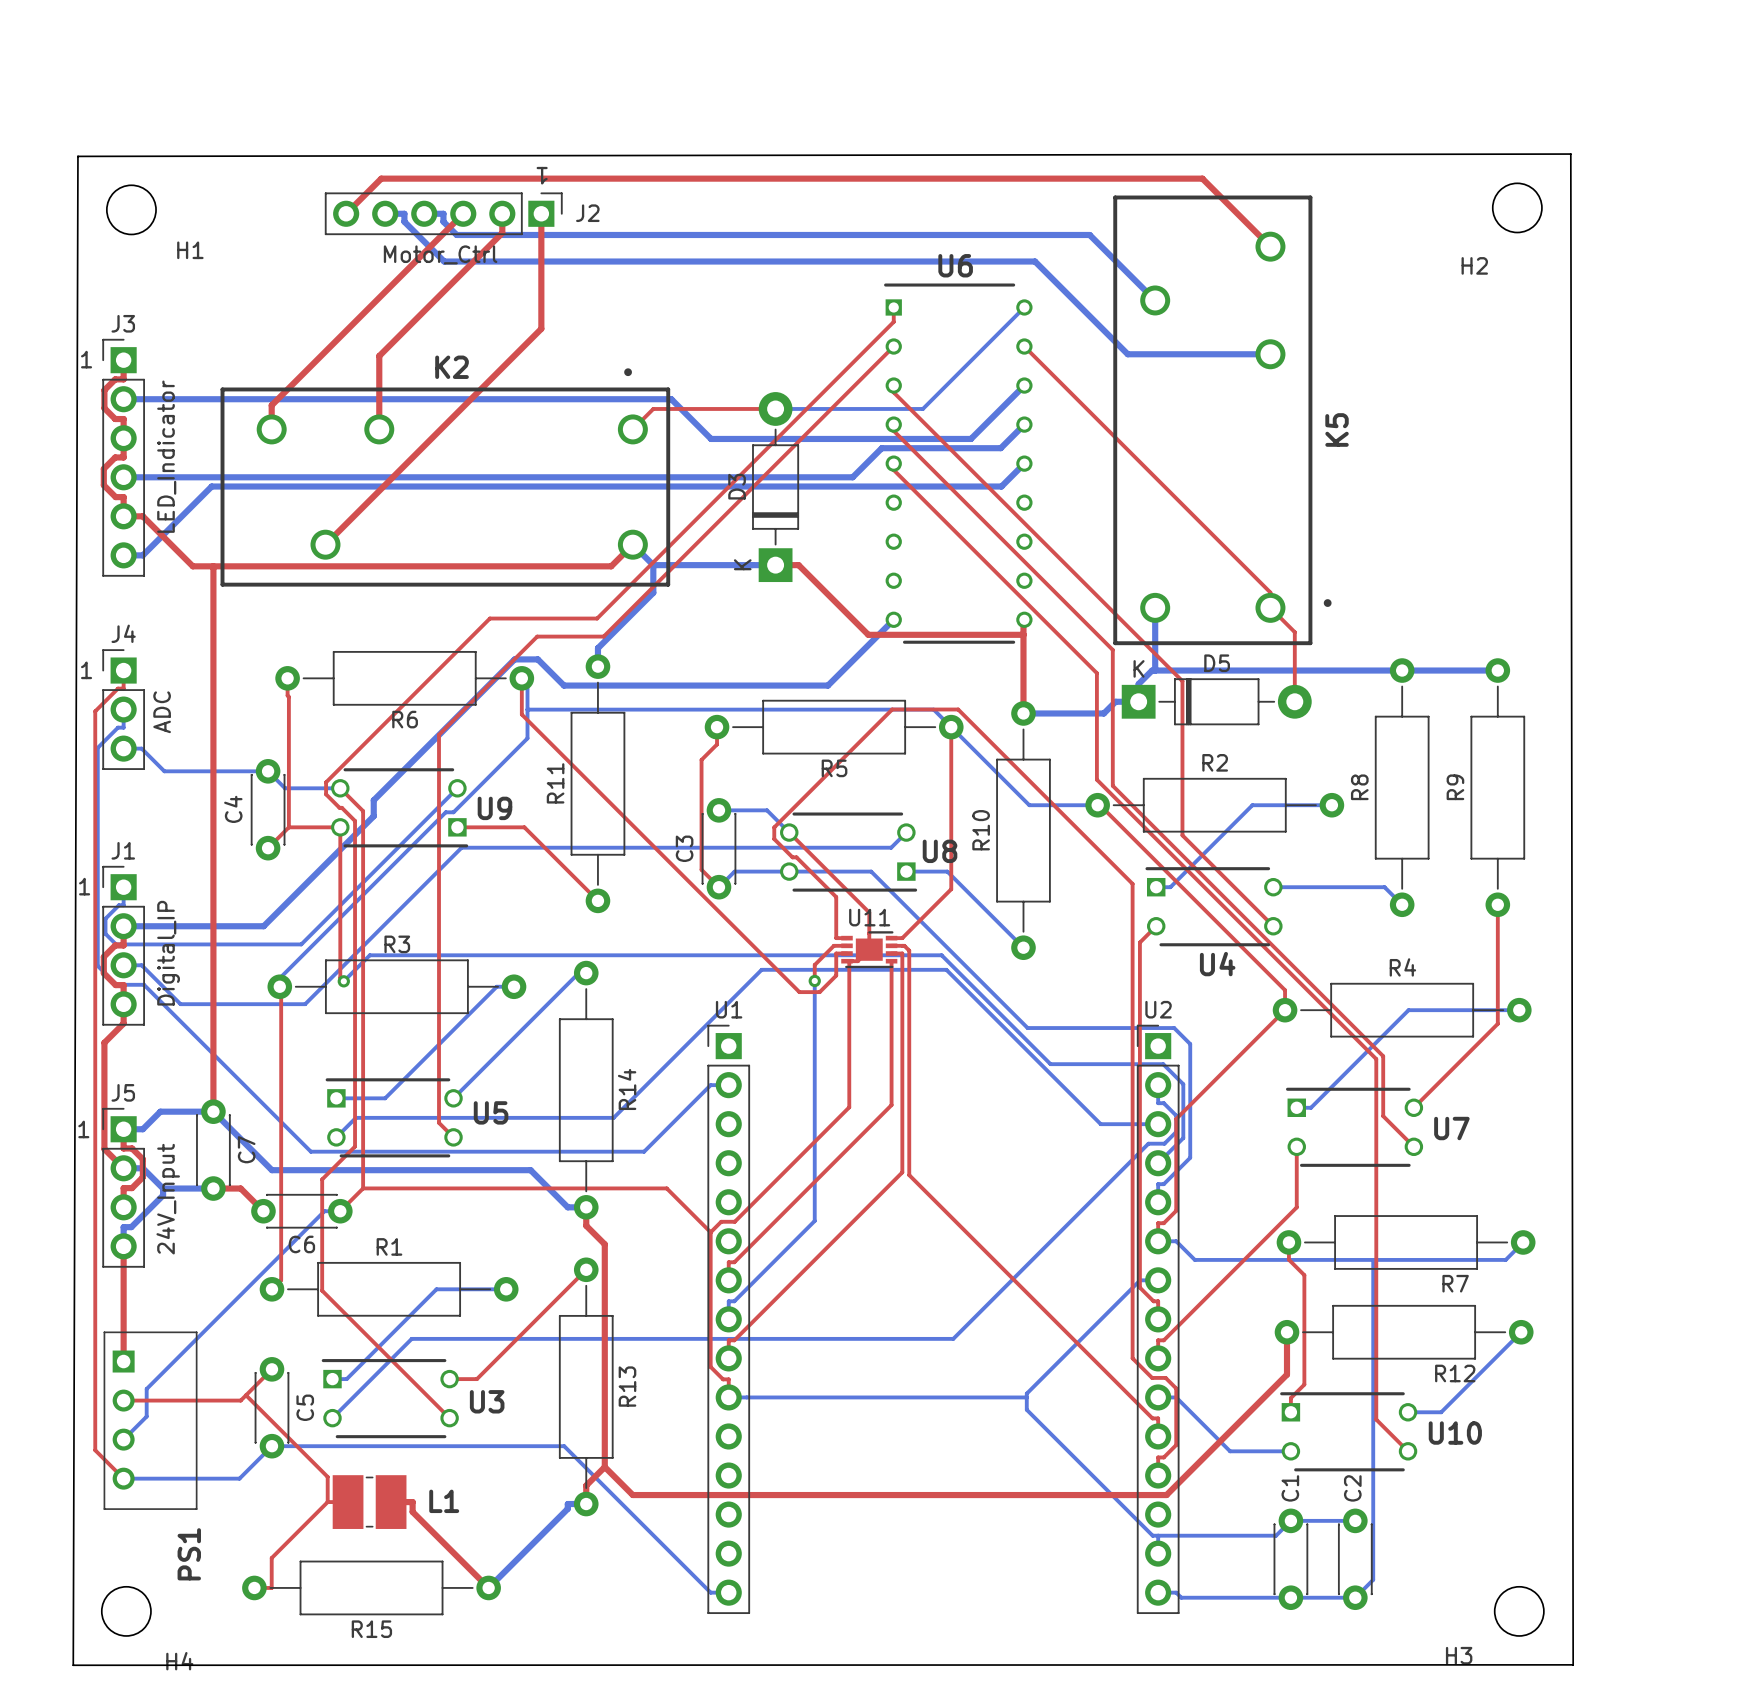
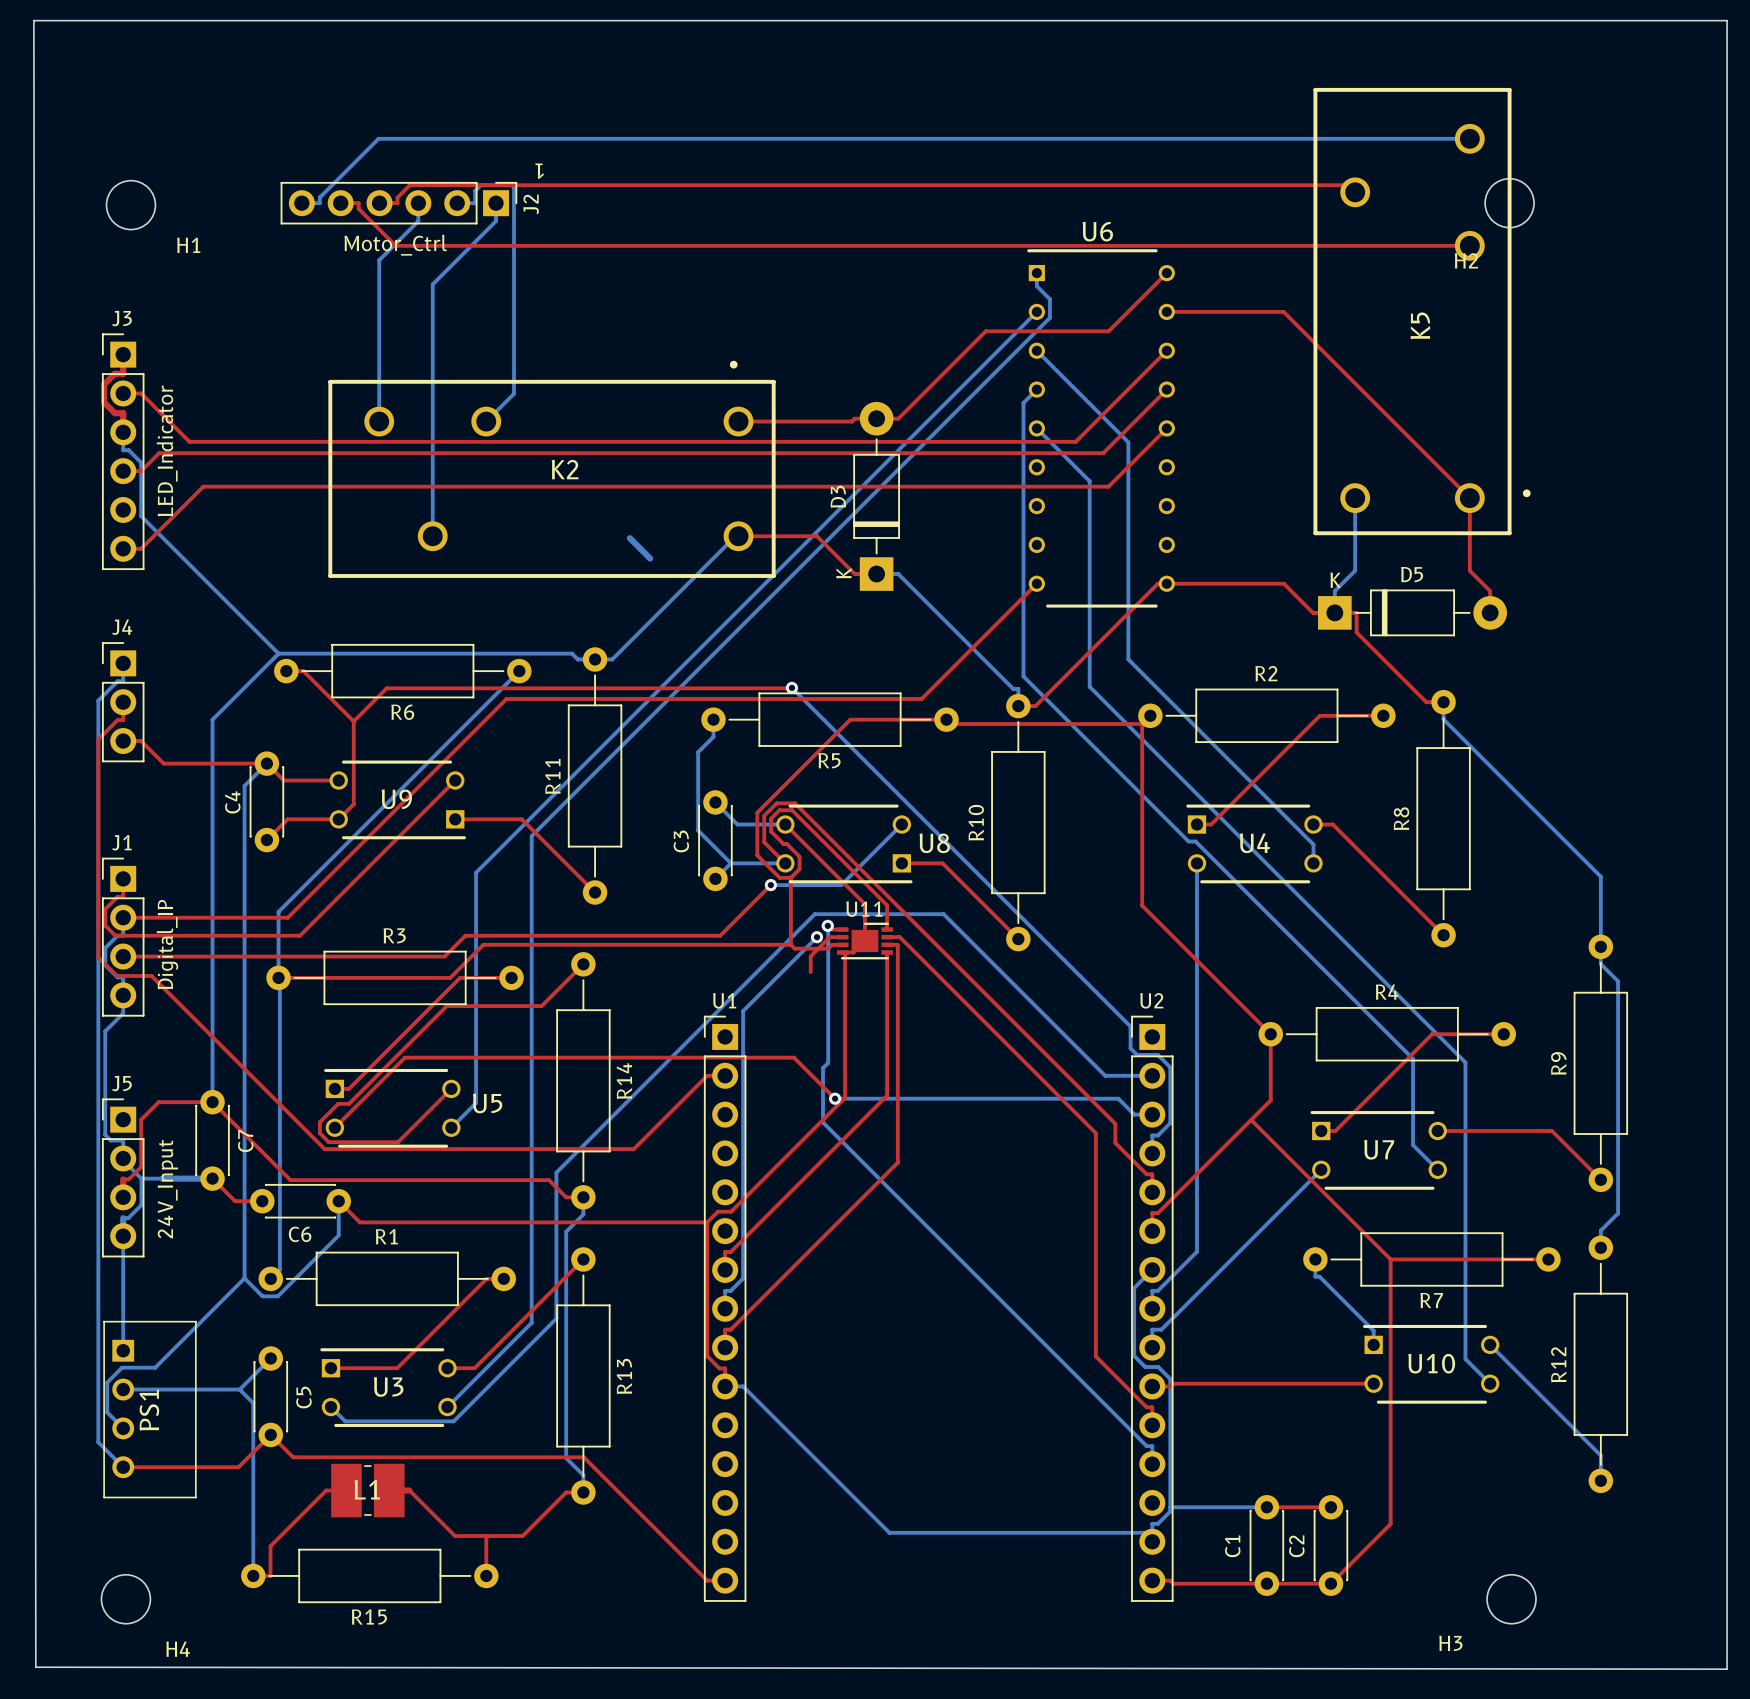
bottom track: none -> (1469, 138) (378, 138) (319, 197) (319, 203) (301, 203)
board edge: (1570, 154) (1573, 1664) (73, 1665) (77, 156) (1570, 154) -> (33, 20) (35, 1667) (1727, 1669) (1727, 20) (33, 20)
top track: none -> (1355, 192) (1348, 185) (409, 185) (397, 197) (397, 203) (379, 203)
top track: none -> (340, 203) (358, 203) (358, 208) (395, 245) (1469, 245)
bottom track: none -> (418, 203) (418, 221) (379, 260) (379, 421)
bottom track: none -> (457, 203) (475, 203) (475, 190) (480, 185) (511, 185) (513, 187) (513, 393) (486, 421)
bottom track: none -> (496, 203) (496, 221) (432, 284) (432, 536)
top track: (346, 213) (381, 178) (1202, 178) (1270, 246) -> none
bottom track: (385, 213) (404, 213) (404, 221) (444, 261) (1035, 261) (1127, 354) (1270, 354) -> none
bottom track: (424, 213) (443, 213) (443, 221) (456, 234) (1089, 234) (1155, 300) -> none
J2 position: (443, 213) -> (398, 203)
top track: (463, 213) (271, 405) (271, 429) -> none
top track: (502, 213) (502, 232) (379, 356) (379, 429) -> none
top track: (541, 213) (541, 328) (325, 544) -> none
J2 name rotation: 0° (587, 213) -> 90° counterclockwise (531, 204)
bottom track: none -> (1036, 273) (1036, 286) (1049, 299) (1049, 317) (531, 836) (531, 1322) (447, 1407)
top track: none -> (1166, 273) (1108, 331) (985, 331) (898, 418) (854, 418) (851, 421) (738, 421)
top track: (893, 307) (893, 321) (597, 618) (489, 618) (326, 782) (326, 794) (355, 820) (355, 1146) (322, 1179) (322, 1290) (449, 1418) -> none
bottom track: (1024, 307) (922, 408) (775, 408) -> none
bottom track: none -> (1036, 311) (476, 872) (476, 1103) (451, 1127)
top track: none -> (1166, 311) (1283, 311) (1469, 498) (1469, 570) (1490, 591) (1490, 612)
top track: (893, 346) (603, 636) (537, 636) (439, 734) (439, 1122) (453, 1137) -> none
top track: (1024, 346) (1270, 592) (1270, 607) (1294, 632) (1294, 701) -> none
bottom track: none -> (1036, 350) (1128, 442) (1128, 659) (1313, 844) (1313, 863)
top track: none -> (1166, 350) (1075, 441) (189, 441) (141, 393) (123, 393)
text: 1 (86, 359) -> none
K2 name position: K2 (452, 367) -> K2 (565, 469)
top track: (893, 385) (893, 392) (1182, 681) (1182, 835) (1273, 926) -> none
bottom track: (1024, 385) (970, 438) (711, 438) (671, 399) (123, 399) -> none
bottom track: none -> (1036, 389) (1023, 402) (1023, 676) (1188, 841) (1195, 841) (1413, 1058) (1413, 1145) (1437, 1169)
top track: none -> (1166, 389) (1103, 453) (159, 453) (141, 471) (123, 471)
top track: (775, 408) (653, 408) (632, 429) -> none
K5 position: (1222, 420) -> (1422, 311)
top track: (893, 424) (893, 430) (1112, 649) (1112, 785) (1383, 1056) (1383, 1116) (1413, 1146) -> none
bottom track: (1024, 424) (1000, 448) (881, 448) (852, 477) (123, 477) -> none
K5 name position: K5 (1337, 429) -> K5 (1420, 325)
bottom track: none -> (1036, 428) (1089, 481) (1089, 686) (1465, 1062) (1465, 1359) (1490, 1383)
top track: none -> (1166, 428) (1108, 486) (203, 486) (141, 548) (123, 548)
top track: (123, 438) (123, 457) (115, 457) (103, 468) (103, 485) (115, 497) (123, 497) (123, 516) (142, 516) (192, 566) (611, 566) (632, 544) -> none
bottom track: none -> (123, 432) (123, 450) (128, 450) (141, 462) (141, 516) (278, 653)
top track: (893, 463) (893, 470) (1096, 673) (1096, 779) (1376, 1059) (1376, 1419) (1408, 1451) -> none
U6 position: (958, 463) -> (1101, 428)
bottom track: (1024, 463) (1001, 486) (211, 486) (142, 555) (123, 555) -> none
K2 position: (445, 477) -> (552, 469)
D3 position: (775, 487) -> (876, 496)
bottom track: none -> (1355, 498) (1355, 570) (1334, 591) (1334, 612)
top track: none -> (738, 536) (817, 536) (854, 574) (876, 574)
bottom track: none -> (738, 536) (735, 536) (612, 659) (577, 659) (572, 653) (278, 653)
top track: (775, 565) (798, 565) (868, 634) (1023, 634) -> none
bottom track: (775, 565) (653, 565) (653, 592) (597, 648) (597, 666) -> none
top track: (213, 566) (213, 1111) -> none
bottom track: (1155, 607) (1155, 670) -> none
bottom track: (893, 619) (827, 685) (564, 685) (537, 659) (514, 659) (373, 800) (373, 816) (263, 926) (123, 926) -> none
top track: (1024, 619) (1023, 713) -> (1443, 702) (1426, 702) (1356, 632) (1356, 612) (1313, 612) (1283, 583) (1157, 583) (1035, 706) (1018, 706)
bottom track: none -> (278, 653) (212, 719) (212, 1102)
text: 1 (86, 670) -> none
top track: (123, 670) (123, 688) (117, 688) (95, 711) (95, 1450) (123, 1478) -> (725, 1580) (707, 1580) (583, 1457) (293, 1457) (270, 1434) (238, 1467) (123, 1467)
bottom track: (1497, 670) (1152, 670) (1138, 683) (1138, 701) (1115, 701) (1103, 713) (1023, 713) -> (876, 574) (898, 574) (1013, 688) (1018, 688) (1018, 706)
top track: (287, 678) (288, 827) -> (286, 671) (303, 671) (353, 721)
top track: (521, 678) (521, 714) (799, 992) (819, 992) (836, 975) (836, 953) -> (790, 944) (794, 948) (828, 948) (832, 944)
bottom track: (521, 678) (527, 684) (527, 738) (453, 812) (445, 812) (279, 978) -> (519, 671) (278, 911) (278, 969)
top track: none -> (791, 687) (386, 688) (353, 721)
via: none -> (791, 687)
D5 position: (1216, 701) -> (1412, 612)
top track: none -> (123, 702) (123, 720) (117, 720) (98, 739) (98, 957) (117, 975) (151, 975) (324, 1149) (633, 1149) (707, 1075) (725, 1075)
bottom track: (123, 709) (123, 727) (117, 727) (97, 747) (97, 965) (105, 973) -> (123, 917) (123, 935) (117, 935) (105, 948) (105, 965)
bottom track: (527, 709) (933, 709) (1029, 805) (1097, 805) -> none
bottom track: none -> (1443, 702) (1443, 719) (1600, 876) (1600, 964) (1618, 981) (1618, 1213) (1600, 1230) (1600, 1247)
J4 value: ADC (162, 712) -> none
top track: none -> (1383, 715) (1319, 715) (1211, 824) (1196, 824)
top track: (717, 727) (717, 744) (701, 759) (701, 869) (718, 887) -> none
bottom track: none -> (713, 719) (713, 736) (698, 752) (698, 830) (730, 863)
top track: (951, 727) (951, 889) (902, 938) (891, 938) -> (779, 810) (792, 810) (887, 905) (887, 929)
top track: none -> (1142, 724) (950, 724) (946, 719) (850, 719) (757, 812) (757, 855) (779, 877) (790, 877)
bottom track: (123, 748) (141, 748) (164, 771) (268, 771) (285, 788) (340, 788) -> none
bottom track: none -> (266, 763) (244, 785) (244, 1278)
R8 position: (1402, 787) -> (1443, 818)
R9 position: (1497, 787) -> (1600, 1063)
top track: (340, 788) (363, 811) (363, 1188) -> (338, 780) (283, 780) (266, 763) (163, 763) (141, 741) (123, 741)
top track: none -> (455, 780) (299, 935) (115, 935) (105, 925) (105, 909) (117, 896) (123, 896) (123, 878)
bottom track: (457, 788) (301, 944) (116, 944) (105, 933) (105, 918) (118, 905) (123, 905) (123, 887) -> none
top track: (1097, 805) (1100, 805) (1285, 990) (1285, 1010) (1176, 1118) (1176, 1210) -> (1142, 724) (1142, 905) (1270, 1034) (1270, 1100) (1170, 1200)
R2 position: (1214, 805) -> (1266, 715)
bottom track: (1331, 805) (1252, 805) (1170, 887) (1156, 887) -> none
U9 name position: U9 (494, 808) -> U9 (396, 799)
bottom track: (718, 810) (767, 810) (789, 832) -> (715, 802) (737, 824) (785, 824)
top track: (783, 818) (892, 709) (958, 709) (1132, 883) (1132, 1358) (1152, 1377) (1165, 1377) (1176, 1388) (1176, 1445) (1163, 1457) (1158, 1457) (1158, 1475) -> none
top track: (774, 826) (774, 839) (792, 857) (796, 857) (836, 897) (836, 938) -> (771, 818) (771, 831) (799, 856) (799, 869) (790, 877)
top track: (340, 827) (340, 977) (343, 981) -> (338, 819) (353, 804) (353, 721)
top track: none -> (1313, 824) (1332, 824) (1443, 935)
bottom track: (891, 847) (461, 847) (305, 1004) (180, 1004) (141, 965) (123, 965) -> (886, 839) (841, 885) (770, 885)
top track: none -> (785, 863) (764, 842) (764, 815) (776, 803) (794, 803) (1115, 1123) (1115, 1142) (1146, 1174) (1152, 1174) (1152, 1192)
bottom track: (789, 871) (871, 871) (1027, 1028) (1174, 1028) (1190, 1044) (1190, 1157) (1163, 1184) (1158, 1184) (1158, 1202) -> none
top track: none -> (901, 863) (942, 863) (1018, 939)
bottom track: (906, 871) (947, 871) (1023, 947) -> none
bottom track: none -> (1196, 863) (1196, 1251) (1157, 1290) (1152, 1290) (1152, 1308)
text: 1 (84, 886) -> none
top track: none -> (790, 877) (790, 944)
bottom track: (1273, 887) (1384, 887) (1402, 904) -> none
top track: none -> (770, 885) (720, 935) (465, 935) (444, 956) (123, 956)
via: none -> (770, 885)
top track: (1497, 904) (1497, 1023) (1413, 1107) -> none
U4 position: (1214, 906) -> (1254, 843)
top track: (123, 926) (123, 945) (115, 945) (103, 956) (103, 973) (115, 985) (123, 985) (123, 1023) (104, 1042) (104, 1149) (123, 1168) -> (123, 917) (287, 917) (506, 699) (921, 699) (1036, 583)
top track: (1156, 926) (1139, 942) (1139, 1287) (1153, 1301) (1158, 1301) (1158, 1319) -> none
bottom track: none -> (827, 925) (828, 1062) (823, 1068) (823, 1122) (1146, 1446) (1152, 1446) (1152, 1464)
via: none -> (827, 925)
via: none -> (817, 937)
top track: (909, 950) (909, 1175) (1101, 1367) -> (904, 941) (1095, 1133) (1095, 1356)
U4 name position: U4 (1217, 964) -> U4 (1254, 843)
top track: none -> (583, 964) (541, 1006) (446, 1006) (349, 1103) (338, 1103) (319, 1122) (319, 1133) (328, 1142) (398, 1142) (451, 1088)
bottom track: (586, 973) (578, 973) (453, 1098) -> none
bottom track: (814, 980) (814, 1220) (746, 1288) -> (817, 937) (743, 1011) (743, 1278)
via: (814, 980) -> none
bottom track: (343, 981) (369, 955) (941, 955) (1050, 1064) (1142, 1064) -> (791, 687) (1130, 1026) (1130, 1048) (1137, 1054)
via: (343, 981) -> none
bottom track: (116, 984) (144, 984) (310, 1151) (644, 1151) (710, 1085) (728, 1085) -> (116, 975) (123, 977) (123, 1013) (105, 1031) (105, 1134) (110, 1140) (123, 1140) (123, 1167) (130, 1167) (141, 1178)
top track: (279, 986) (281, 1280) (271, 1289) -> (278, 977) (450, 977) (483, 944) (790, 944)
bottom track: none -> (278, 977) (279, 1269) (270, 1278)
top track: none -> (511, 977) (460, 977) (349, 1088) (334, 1088)
bottom track: (514, 986) (496, 986) (385, 1098) (336, 1098) -> none
R4 position: (1402, 1010) -> (1387, 1034)
bottom track: (1519, 1010) (1408, 1010) (1310, 1107) (1296, 1107) -> none
top track: none -> (1503, 1034) (1432, 1034) (1335, 1130) (1321, 1130)
bottom track: (1163, 1064) (1183, 1084) (1183, 1138) (1158, 1163) -> (1170, 1122) (1157, 1135) (1152, 1135) (1152, 1153)
bottom track: (1158, 1085) (1158, 1103) (1163, 1103) (1176, 1115) -> (1157, 1054) (1170, 1067) (1170, 1106)
top track: none -> (835, 1098) (794, 1057) (404, 1057) (334, 1127)
via: none -> (835, 1098)
bottom track: (1140, 1124) (1100, 1124) (946, 969) (761, 969) (613, 1117) (355, 1117) (336, 1137) -> (1134, 1114) (1118, 1098) (835, 1098)
U7 position: (1354, 1127) -> (1378, 1150)
U7 name position: U7 (1451, 1128) -> U7 (1379, 1149)
text: 1 (83, 1129) -> none
top track: (123, 1129) (123, 1148) (132, 1148) (142, 1159) (142, 1177) (132, 1188) (123, 1189) -> (583, 1197) (566, 1197) (548, 1180) (290, 1180) (212, 1102) (158, 1102) (141, 1119) (141, 1167) (128, 1179) (123, 1179)
bottom track: (123, 1129) (142, 1129) (160, 1111) (213, 1111) (271, 1170) (530, 1170) (567, 1207) (586, 1207) -> none
top track: none -> (1251, 1119) (1390, 1259)
bottom track: (1176, 1131) (1164, 1143) (1148, 1143) (953, 1338) (411, 1338) (332, 1418) -> (1152, 1075) (1105, 1075) (943, 914) (814, 914) (556, 1172) (556, 1318) (453, 1421) (345, 1421) (330, 1407)
top track: none -> (1437, 1130) (1551, 1130) (1600, 1179)
top track: (1296, 1146) (1296, 1207) (1163, 1340) (1158, 1340) (1158, 1358) -> none
bottom track: (123, 1168) (142, 1168) (163, 1188) (163, 1195) (131, 1227) (123, 1228) -> (141, 1178) (141, 1205) (128, 1218) (123, 1218)
bottom track: none -> (1321, 1169) (1161, 1329) (1152, 1329) (1152, 1347)
bottom track: none -> (141, 1178) (162, 1178)
top track: (213, 1188) (240, 1188) (263, 1211) -> (212, 1178) (235, 1201) (262, 1201)
top track: (363, 1188) (666, 1188) (710, 1232) (721, 1221) -> (338, 1201) (359, 1222) (707, 1222) (717, 1211)
top track: (363, 1188) (340, 1211) -> none
top track: (586, 1207) (586, 1225) (604, 1244) (604, 1467) -> none
bottom track: (340, 1211) (324, 1211) (146, 1388) (146, 1416) (123, 1439) -> (244, 1278) (155, 1367) (122, 1367) (107, 1382) (107, 1412) (123, 1428)
bottom track: none -> (338, 1201) (338, 1235) (277, 1296) (262, 1296) (244, 1278)
bottom track: (1158, 1241) (1176, 1241) (1194, 1259) (1505, 1259) (1523, 1242) -> none
top track: (1288, 1242) (1288, 1259) (1304, 1275) (1304, 1384) (1290, 1398) (1290, 1412) -> none
R7 position: (1406, 1242) -> (1431, 1259)
top track: (123, 1246) (123, 1361) -> none
bottom track: none -> (123, 1236) (123, 1350)
bottom track: (1373, 1259) (1373, 1579) (1355, 1597) (1181, 1597) (1176, 1592) (1158, 1592) -> none
bottom track: none -> (1315, 1259) (1315, 1276) (1319, 1276) (1373, 1330) (1373, 1344)
top track: none -> (1390, 1259) (1390, 1524) (1330, 1583) (1173, 1583) (1170, 1580) (1152, 1580)
top track: none -> (1390, 1259) (1548, 1259)
bottom track: (1158, 1280) (1140, 1280) (1026, 1393) (1026, 1409) (1152, 1535) (1276, 1535) (1290, 1520) (1355, 1520) -> (1152, 1269) (1134, 1288) (1134, 1355) (1145, 1367) (1158, 1367) (1170, 1379) (1170, 1511) (1157, 1523) (1152, 1523)
R7 name position: R7 (1455, 1283) -> R7 (1431, 1300)
top track: none -> (503, 1278) (486, 1278) (397, 1368) (330, 1368)
bottom track: (506, 1289) (436, 1289) (346, 1379) (332, 1379) -> none
top track: (1287, 1332) (1287, 1374) (1166, 1495) (632, 1495) (604, 1467) -> none
R12 rotation: 0° (1404, 1332) -> 90° clockwise (1600, 1364)
R12 position: (1404, 1332) -> (1600, 1364)
bottom track: (1521, 1332) (1441, 1412) (1408, 1412) -> none
bottom track: none -> (1490, 1344) (1600, 1455) (1600, 1480)
top track: (271, 1369) (240, 1400) (123, 1400) -> none
bottom track: none -> (270, 1358) (239, 1389)
R12 name position: R12 (1455, 1373) -> R12 (1558, 1364)
top track: none -> (1373, 1383) (1173, 1383) (1170, 1386) (1152, 1386)
top track: (246, 1395) (327, 1476) (327, 1502) -> none
bottom track: (746, 1397) (1026, 1397) -> (743, 1386) (889, 1532) (1152, 1532)
bottom track: (1158, 1397) (1176, 1397) (1230, 1451) (1290, 1451) -> none
bottom track: none -> (123, 1389) (239, 1389)
bottom track: none -> (239, 1389) (253, 1403) (253, 1575)
U3 name position: U3 (487, 1401) -> U3 (388, 1387)
U10 position: (1348, 1431) -> (1431, 1364)
U10 name position: U10 (1455, 1433) -> U10 (1431, 1363)
top track: (604, 1467) (586, 1485) (586, 1504) -> (409, 1490) (455, 1536) (522, 1536) (566, 1492) (583, 1492)
bottom track: (123, 1478) (239, 1478) (271, 1446) (564, 1446) (710, 1592) (728, 1592) -> (123, 1467) (98, 1442) (98, 700) (117, 681) (123, 681) (123, 663)
C1 name position: C1 (1290, 1488) -> C1 (1232, 1546)
C2 name position: C2 (1352, 1488) -> C2 (1296, 1546)
L1 name position: L1 (444, 1501) -> L1 (367, 1489)
top track: (411, 1502) (412, 1511) (488, 1587) -> (486, 1536) (486, 1575)
bottom track: (586, 1504) (567, 1504) (567, 1508) (488, 1587) -> (583, 1492) (583, 1475) (566, 1458) (566, 1231) (583, 1214) (583, 1197)
bottom track: none -> (1170, 1507) (1266, 1507)
top track: none -> (1266, 1507) (1330, 1507)
PS1 name position: PS1 (189, 1554) -> PS1 (149, 1410)
C1 position: (1290, 1559) -> (1266, 1545)
C2 position: (1355, 1559) -> (1330, 1545)

